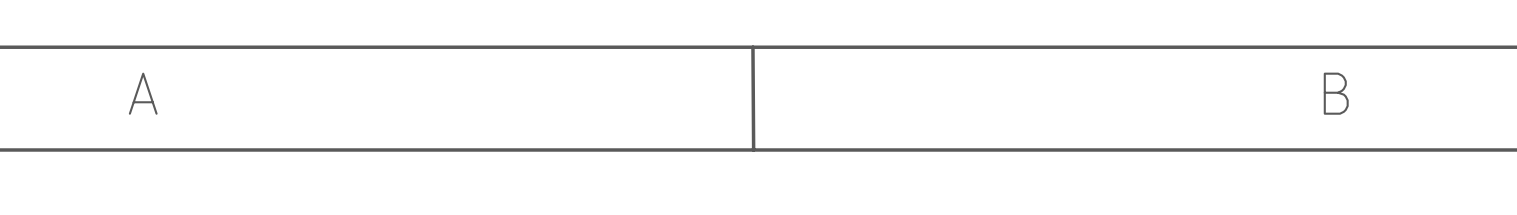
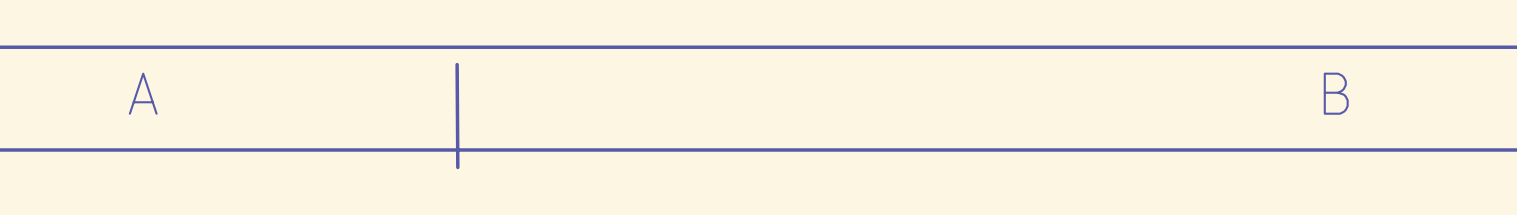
line: (752, 47) (753, 149) -> (457, 64) (457, 167)

